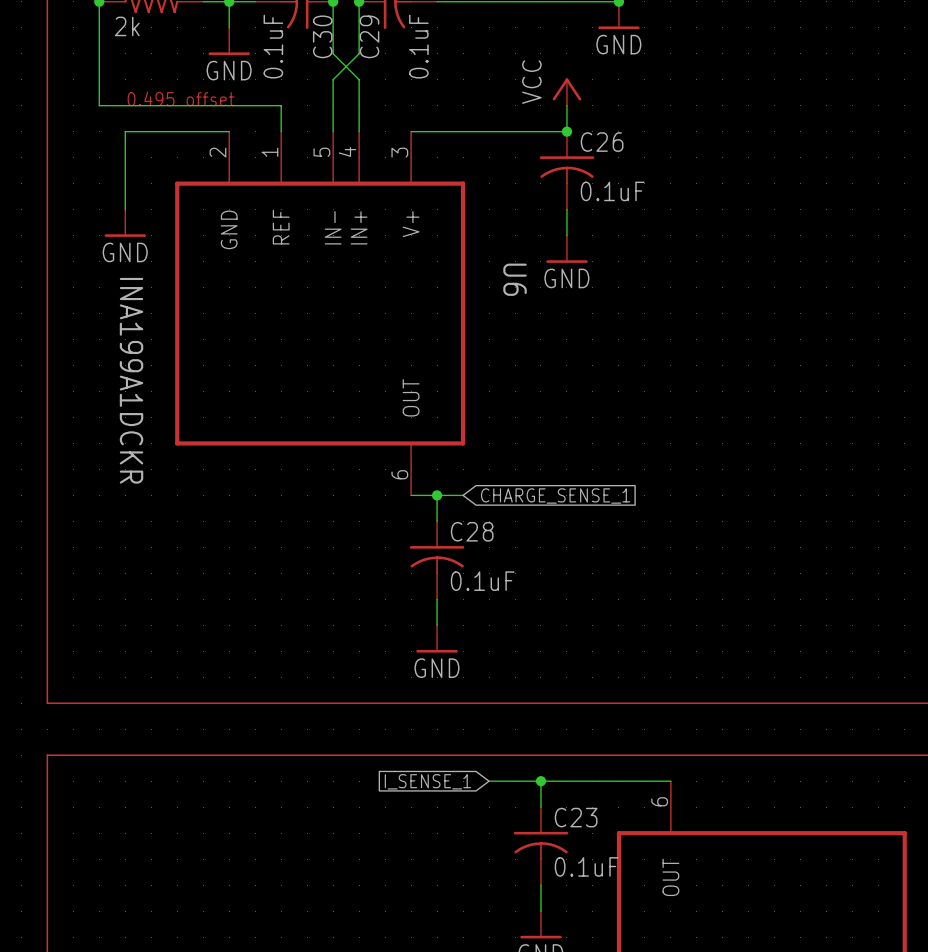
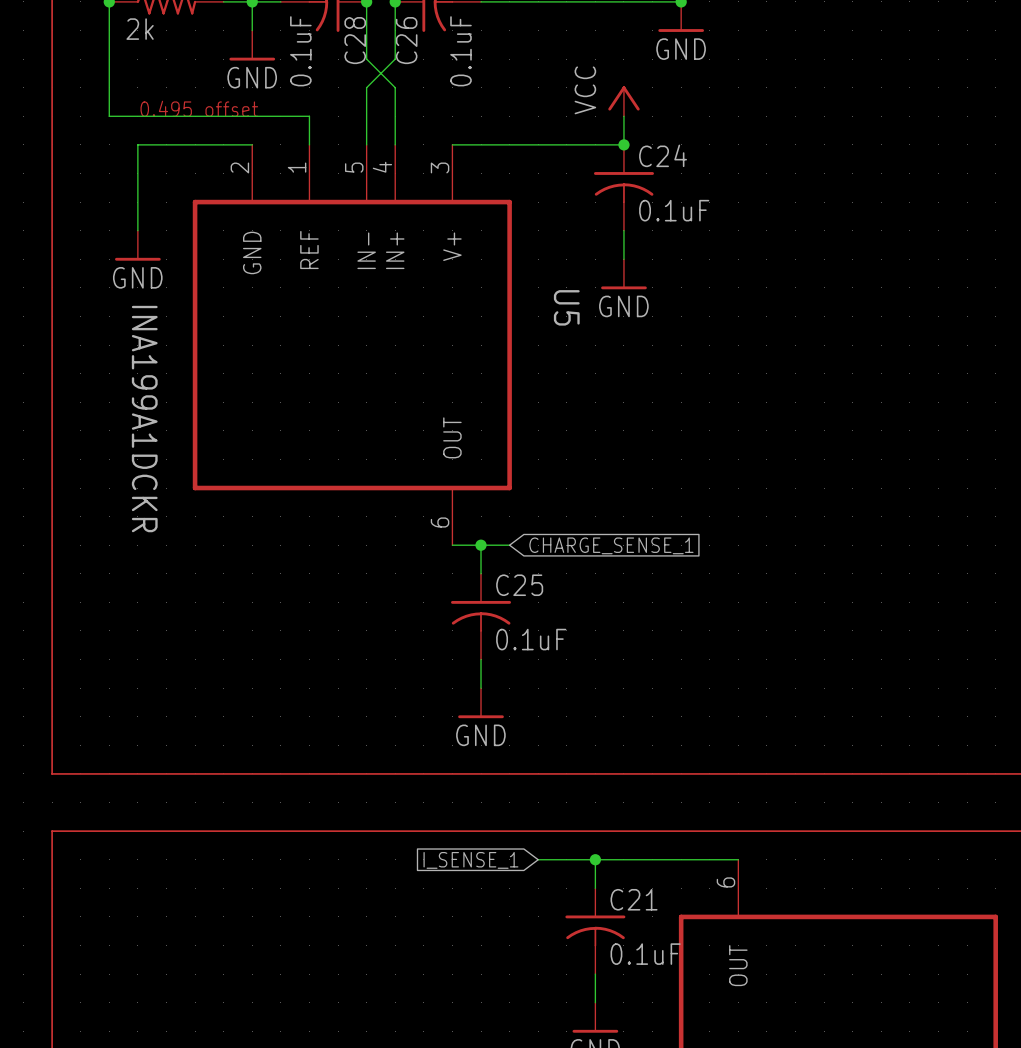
C30 name: C30 (322, 36) -> C28 (355, 40)
C29 name: C29 (369, 36) -> C26 (406, 40)
C26 name: C26 (602, 142) -> C24 (663, 155)
U6 name: U6 (515, 279) -> U5 (566, 307)
C28 name: C28 (472, 531) -> C25 (519, 585)
C23 name: C23 (576, 817) -> C21 (634, 899)

